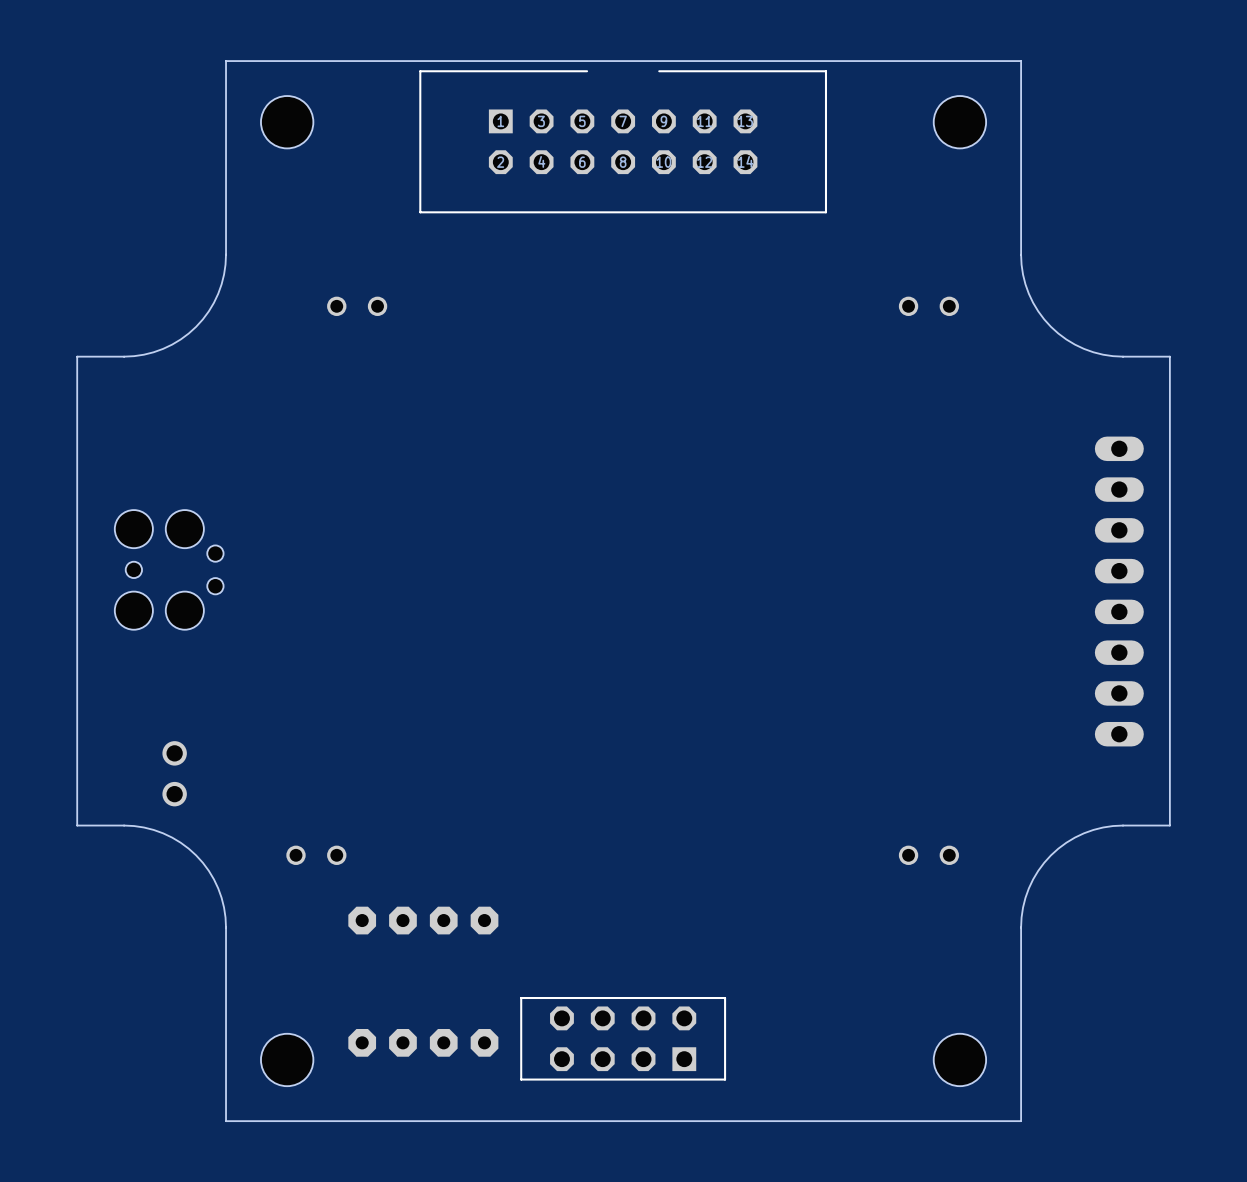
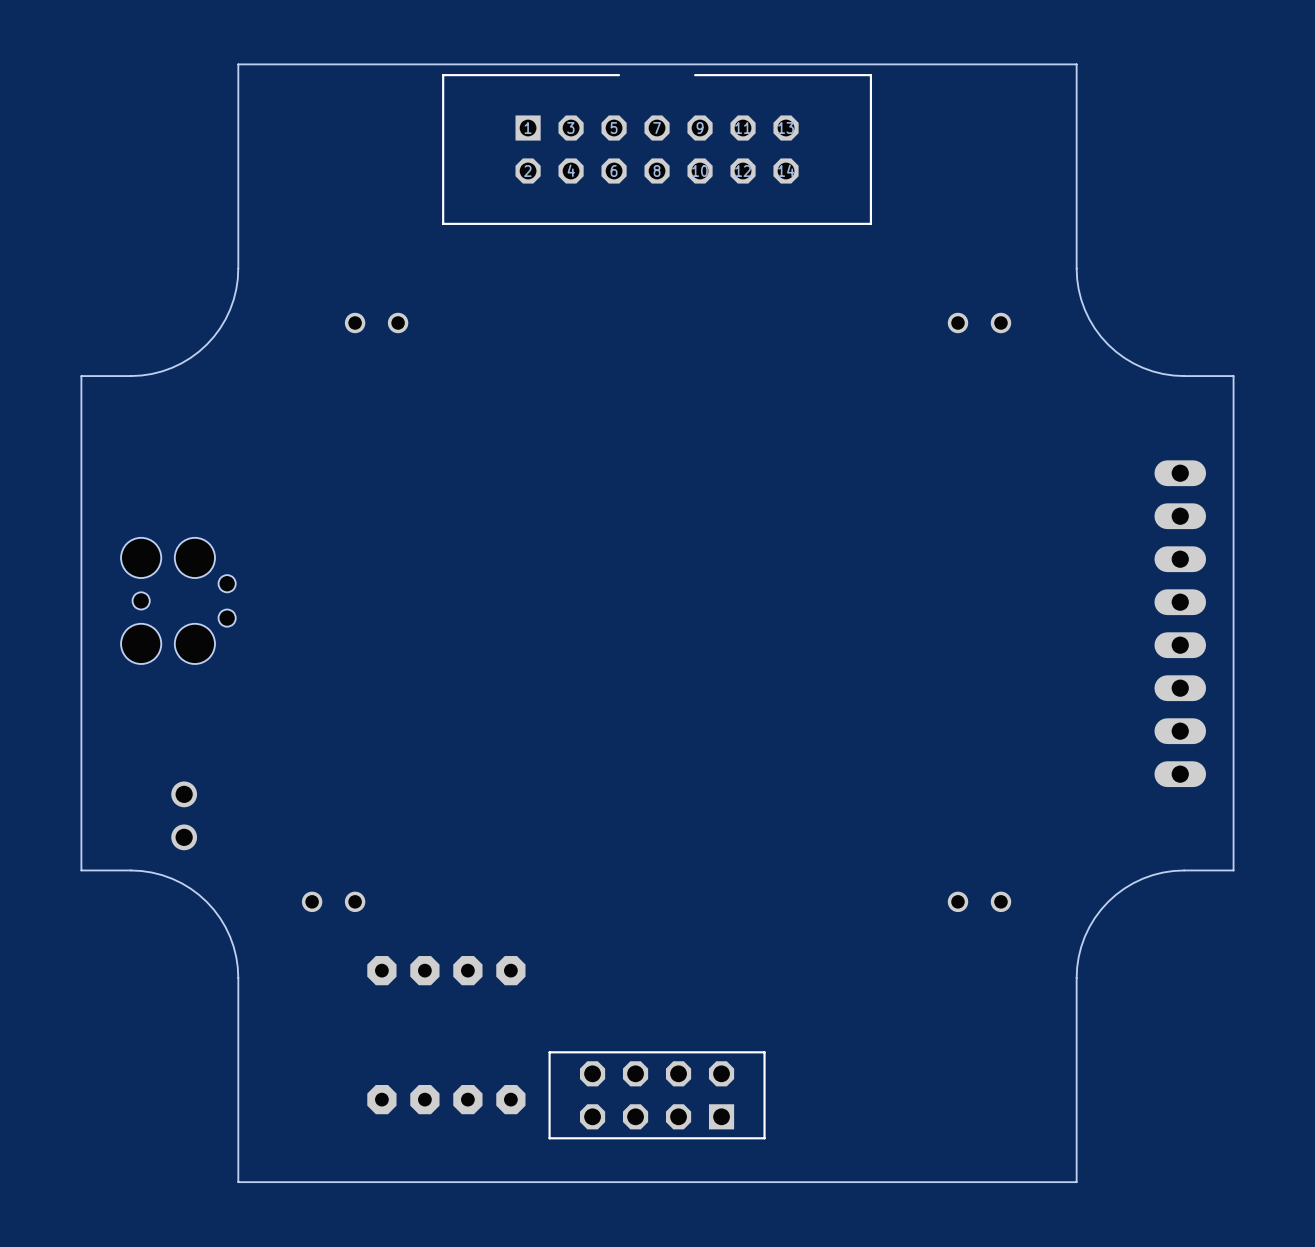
hole: (287, 122) -> none
hole: (959, 122) -> none
hole: (287, 1059) -> none
hole: (959, 1059) -> none

